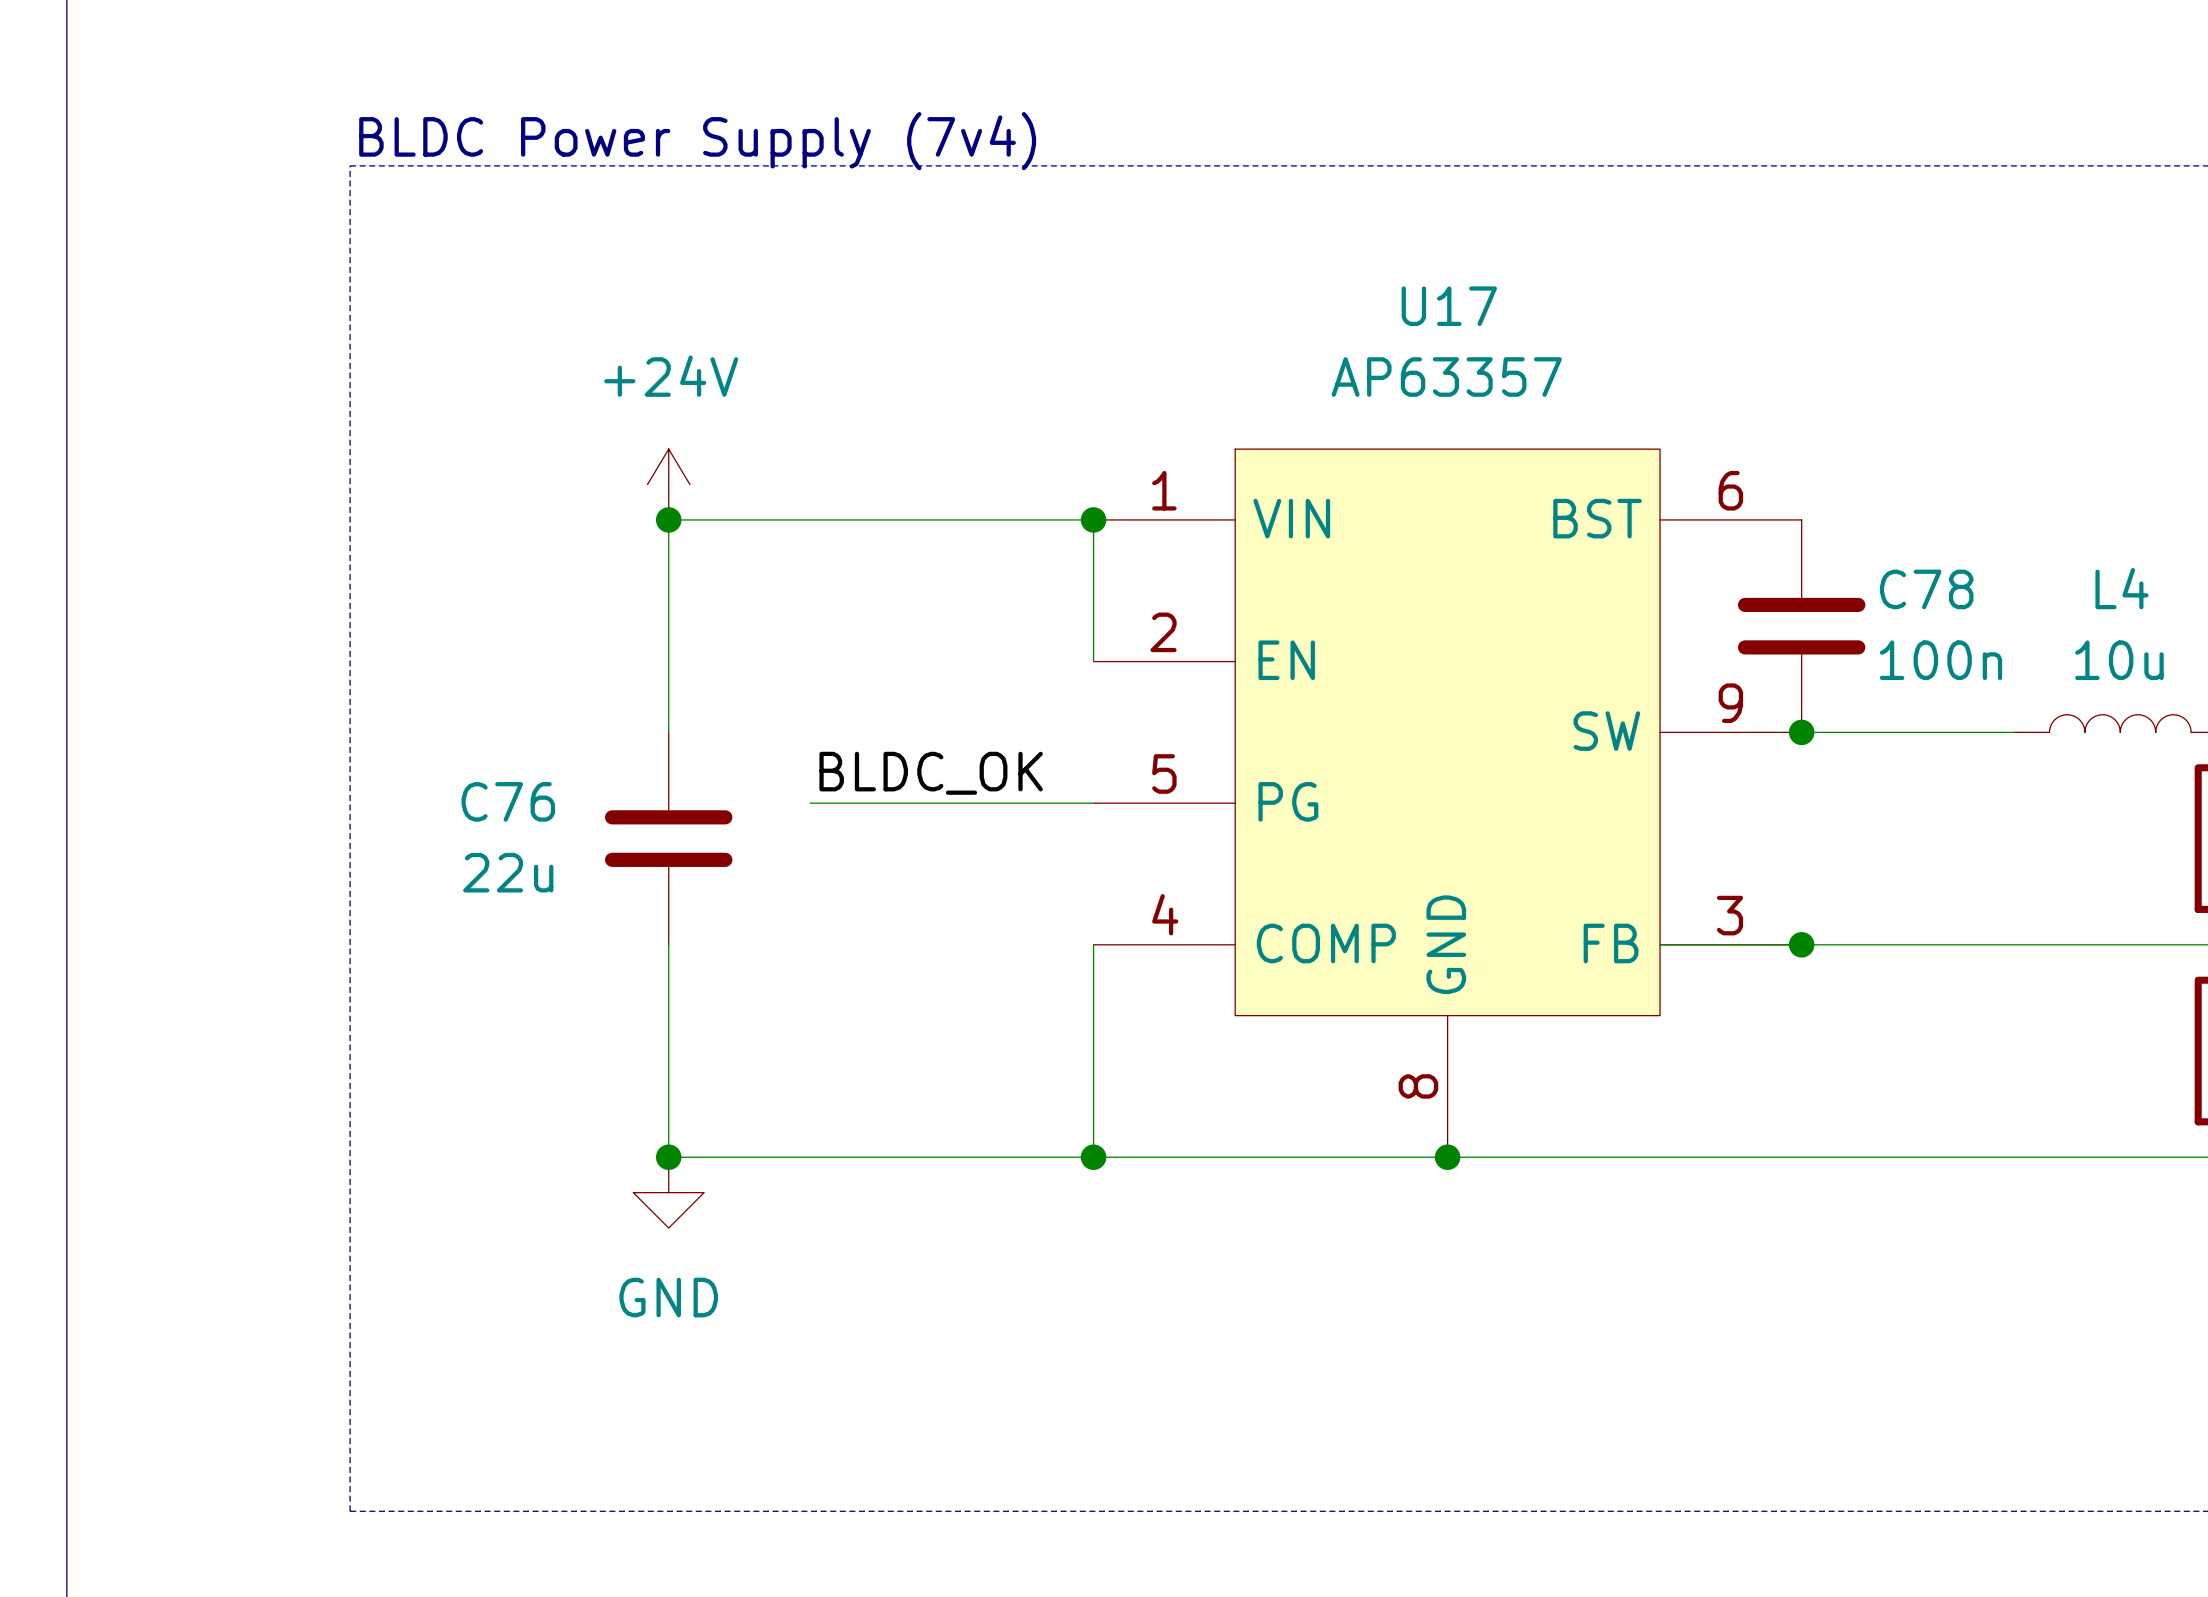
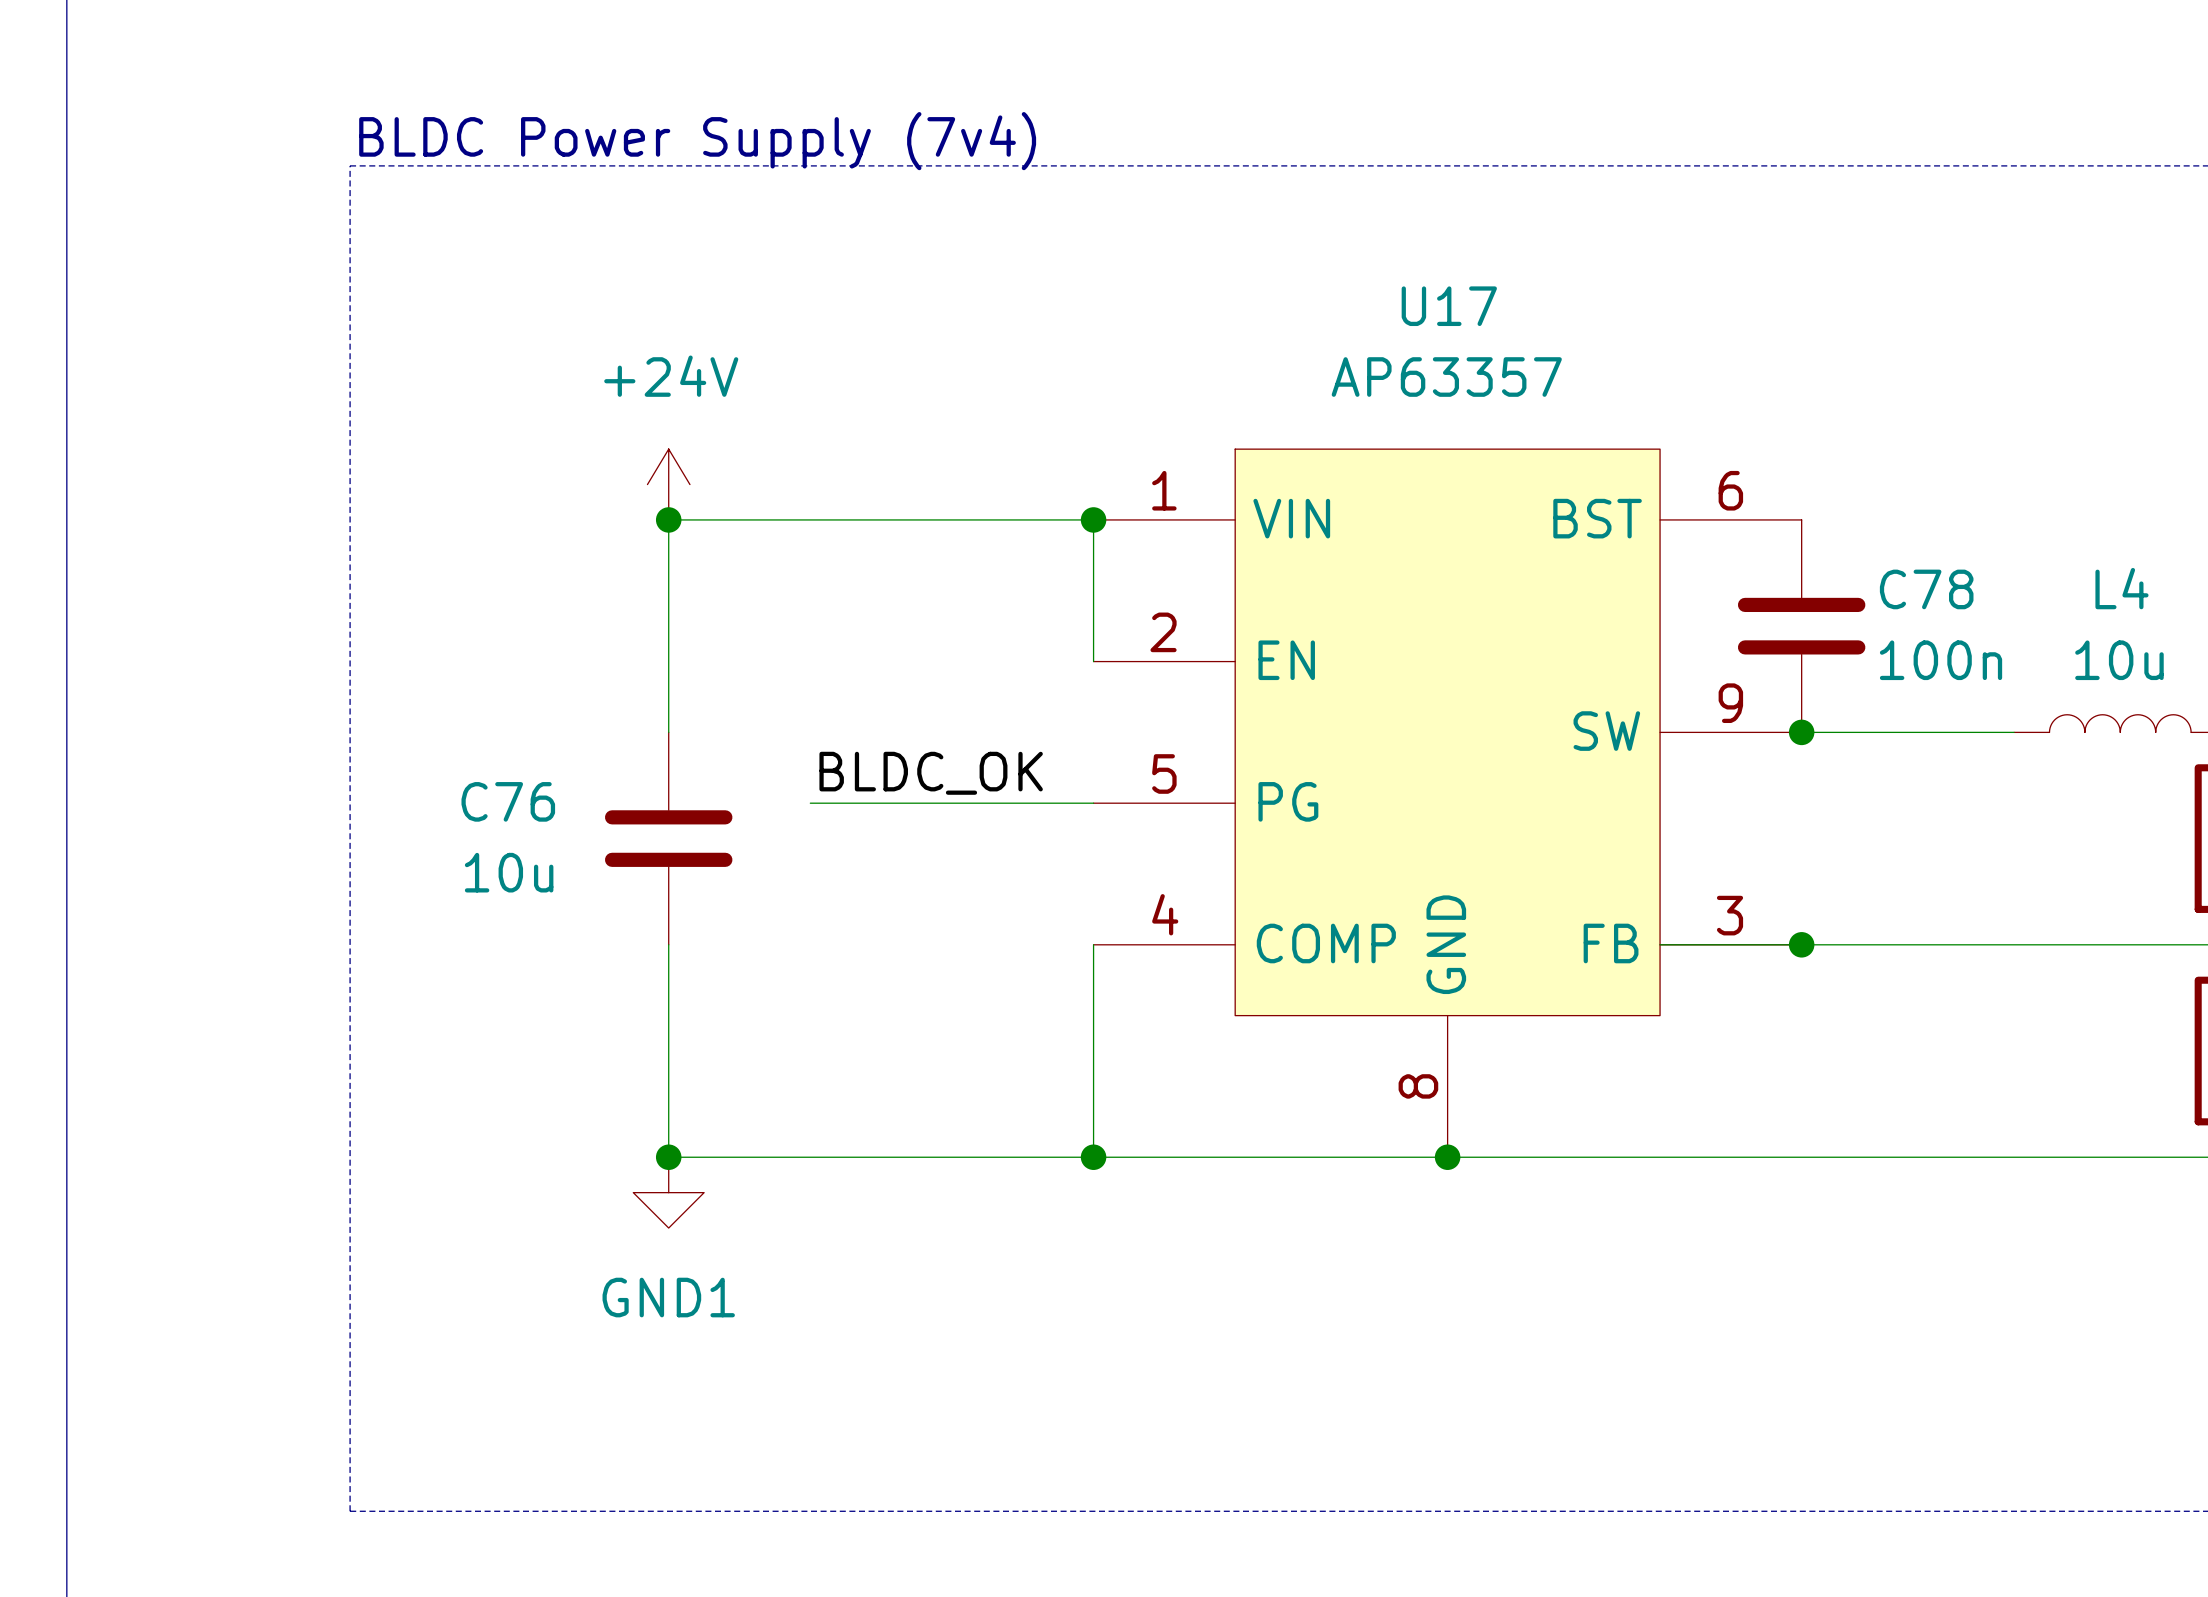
C76 value: 22u (508, 872) -> 10u (509, 872)
power symbol: GND (668, 1192) -> GND1 (668, 1192)

